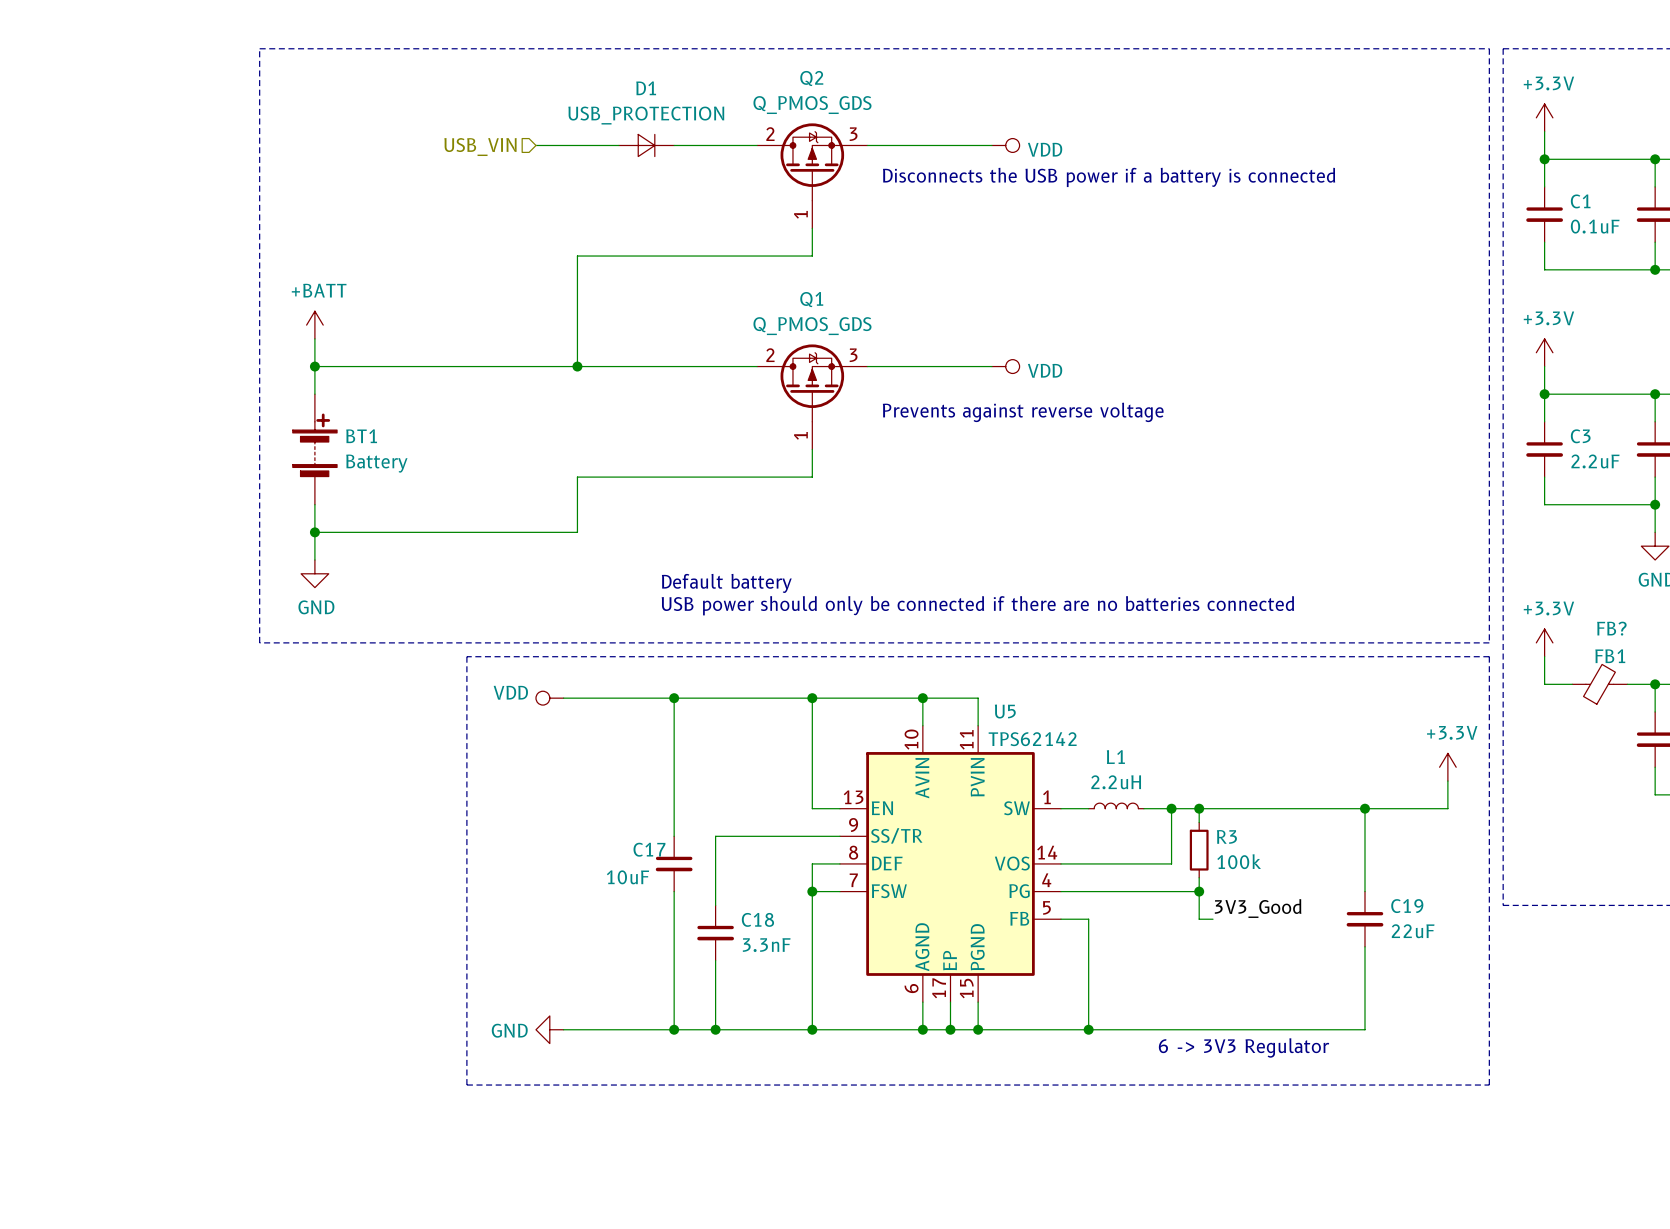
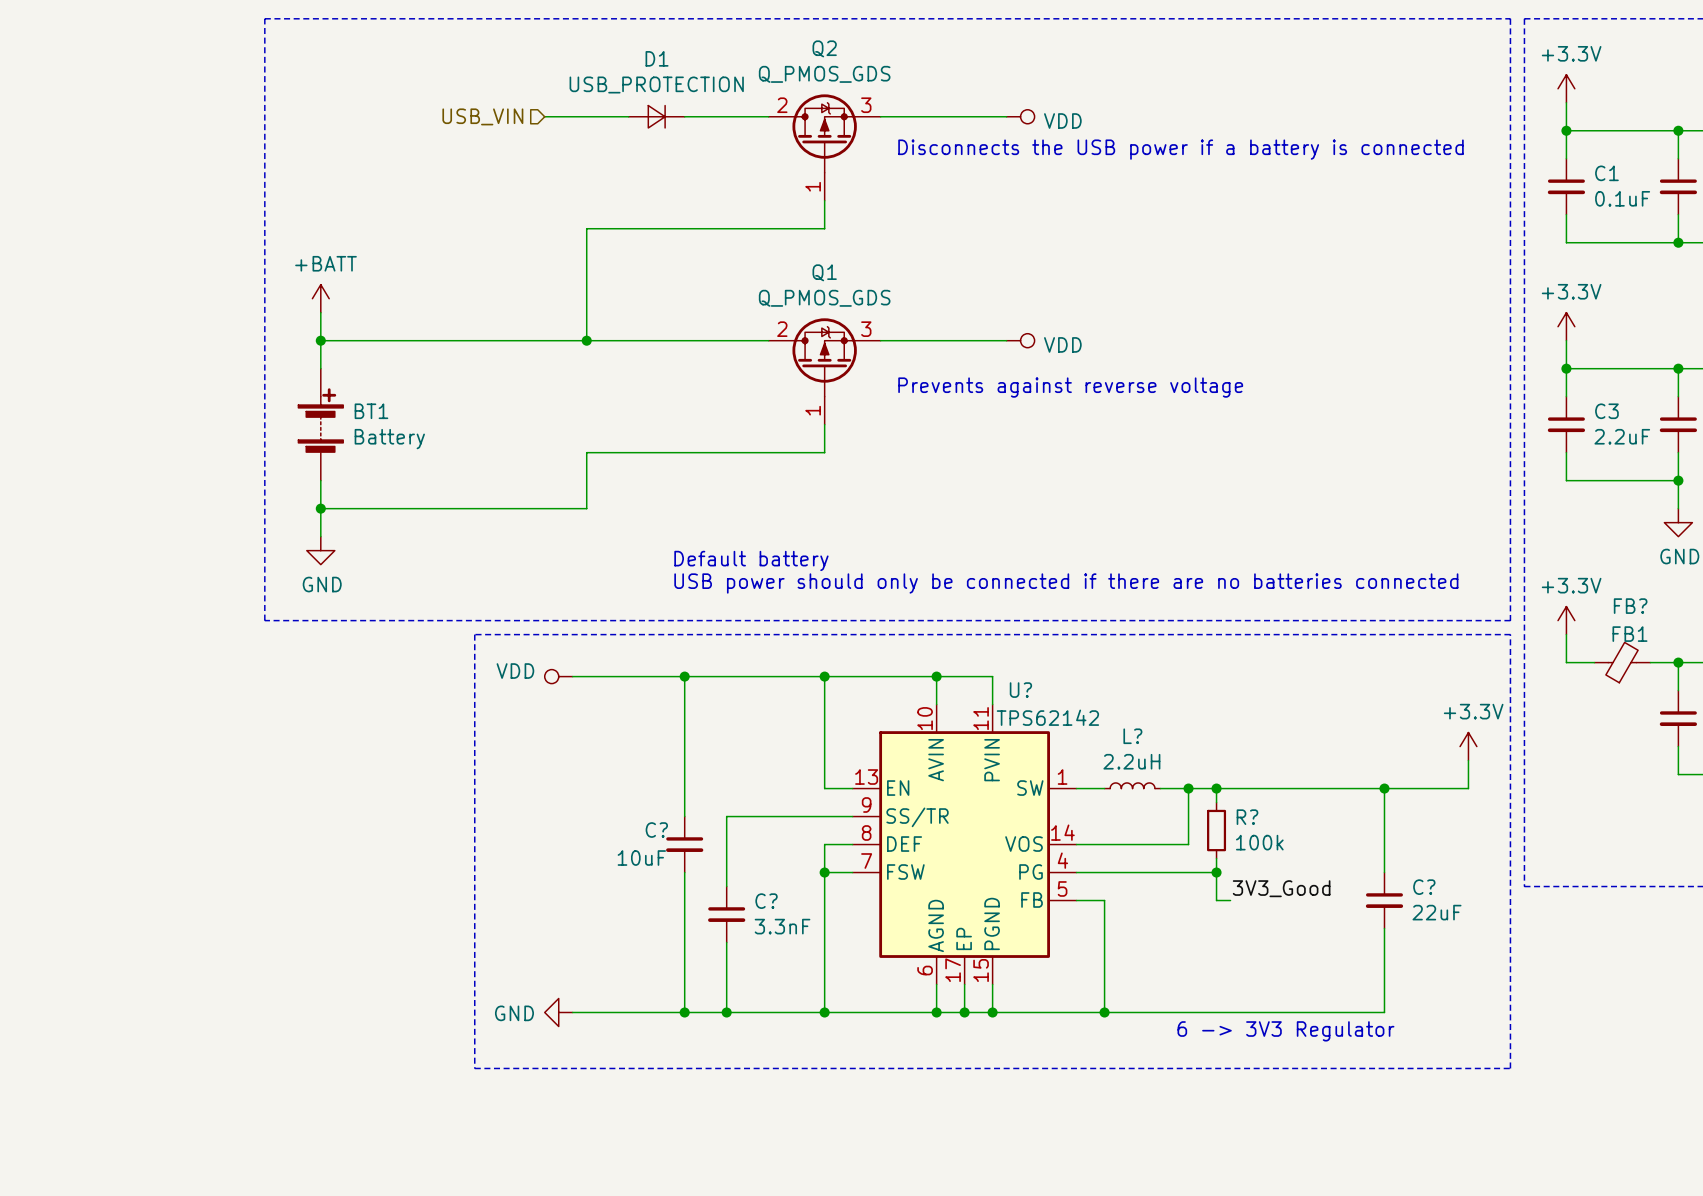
U5 name: U5 (1005, 711) -> U? (1020, 690)
L1 name: L1 (1115, 757) -> L? (1132, 736)
R3 name: R3 (1226, 836) -> R? (1247, 817)
C17 name: C17 (649, 849) -> C? (656, 830)
C19 name: C19 (1407, 906) -> C? (1424, 887)
C18 name: C18 (757, 919) -> C? (766, 901)

